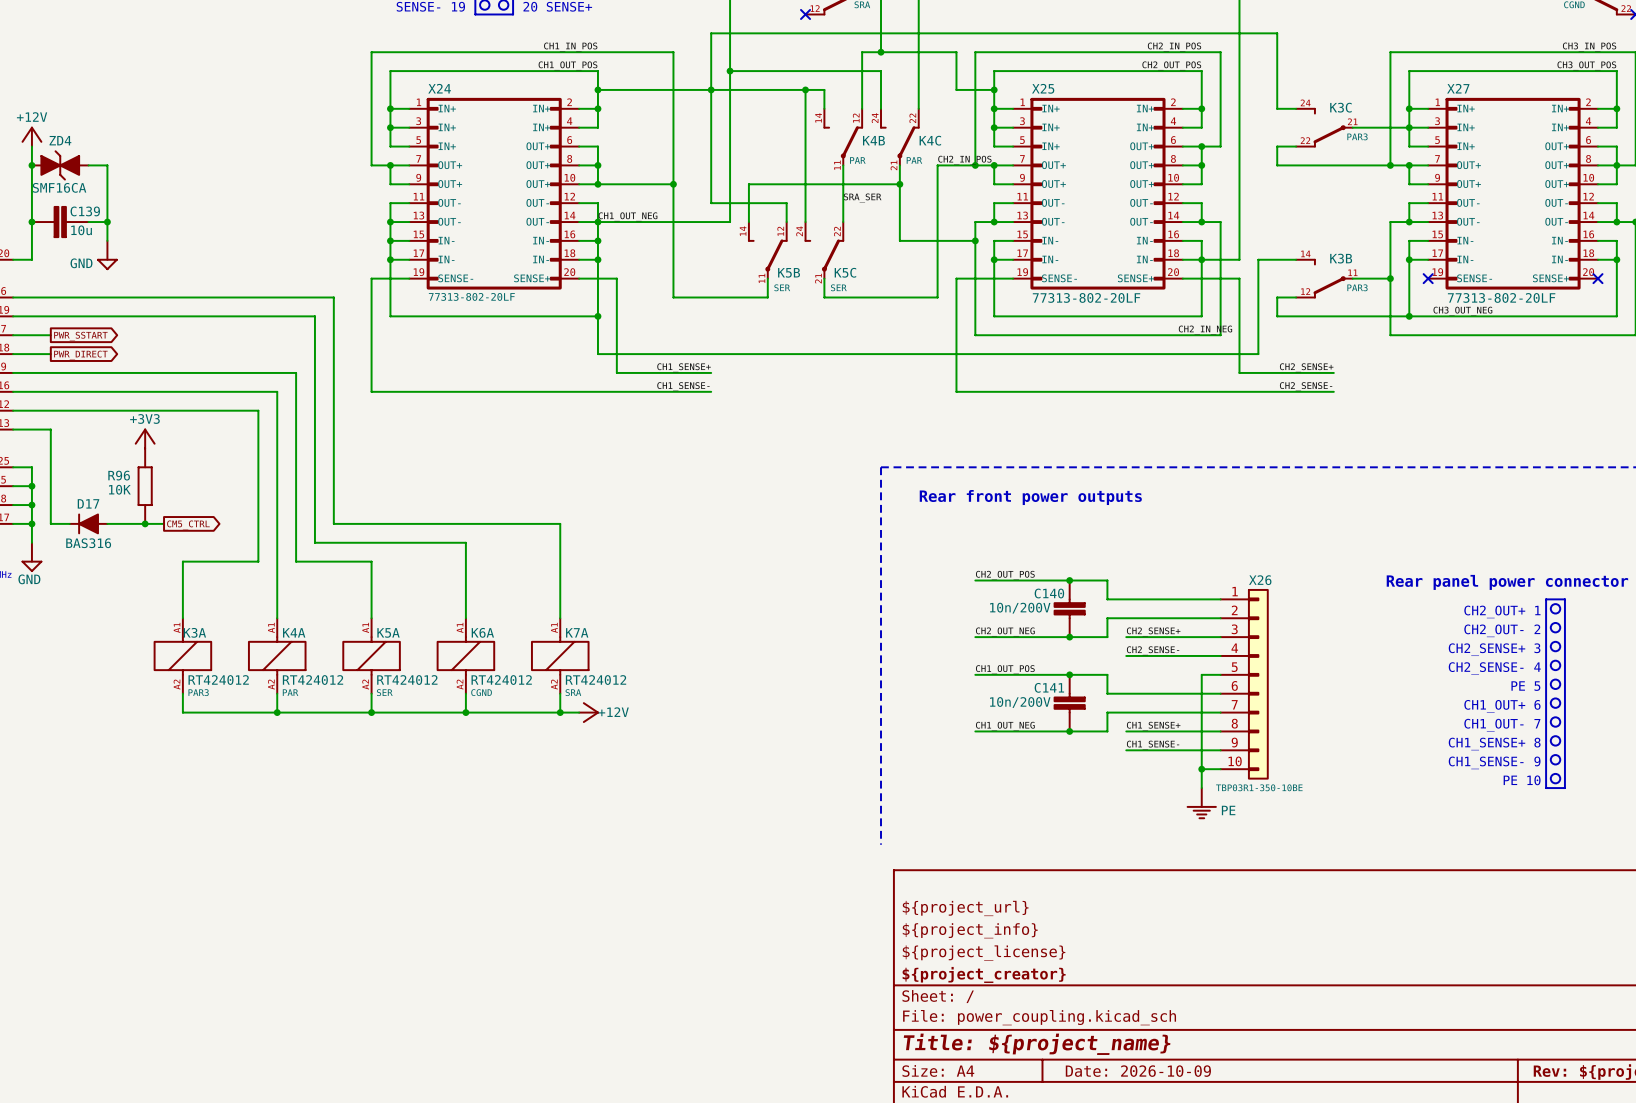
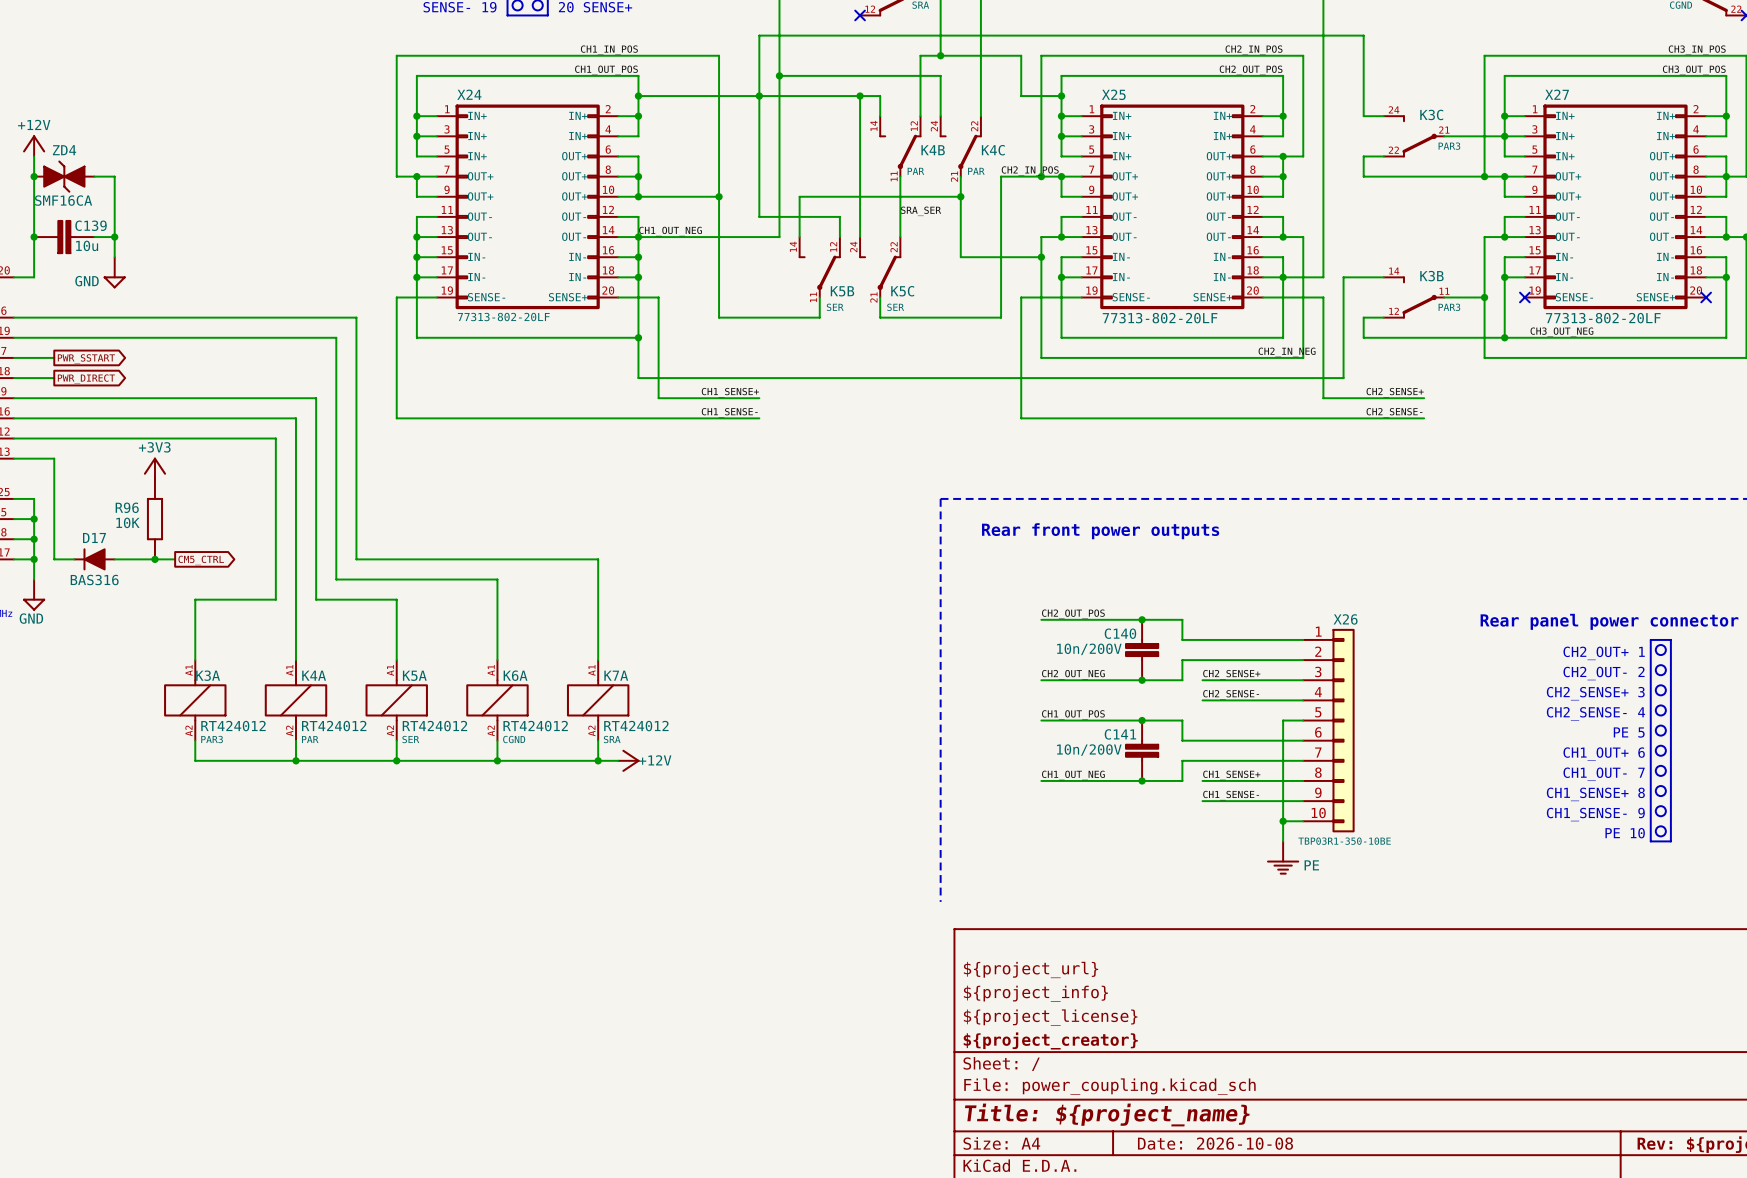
title block: Date: 2026-10-09 (1138, 1071) -> Date: 2026-10-08 (1215, 1143)

